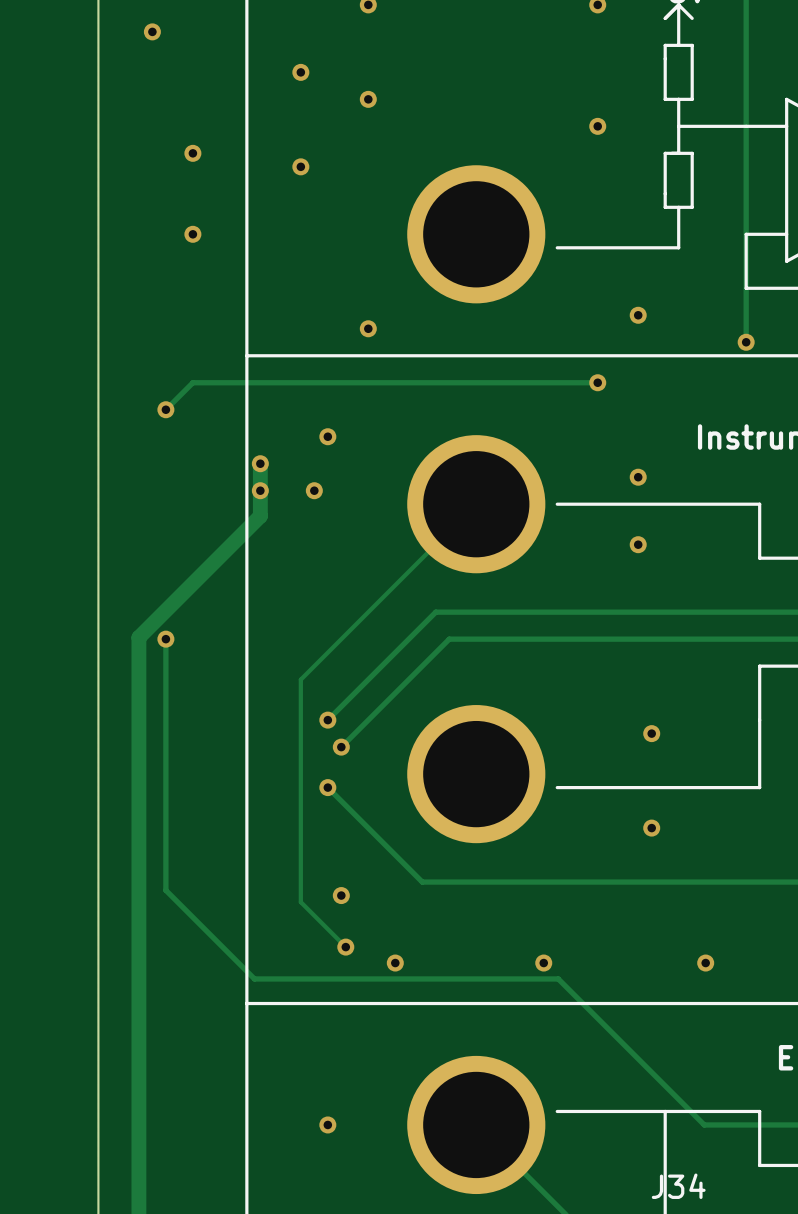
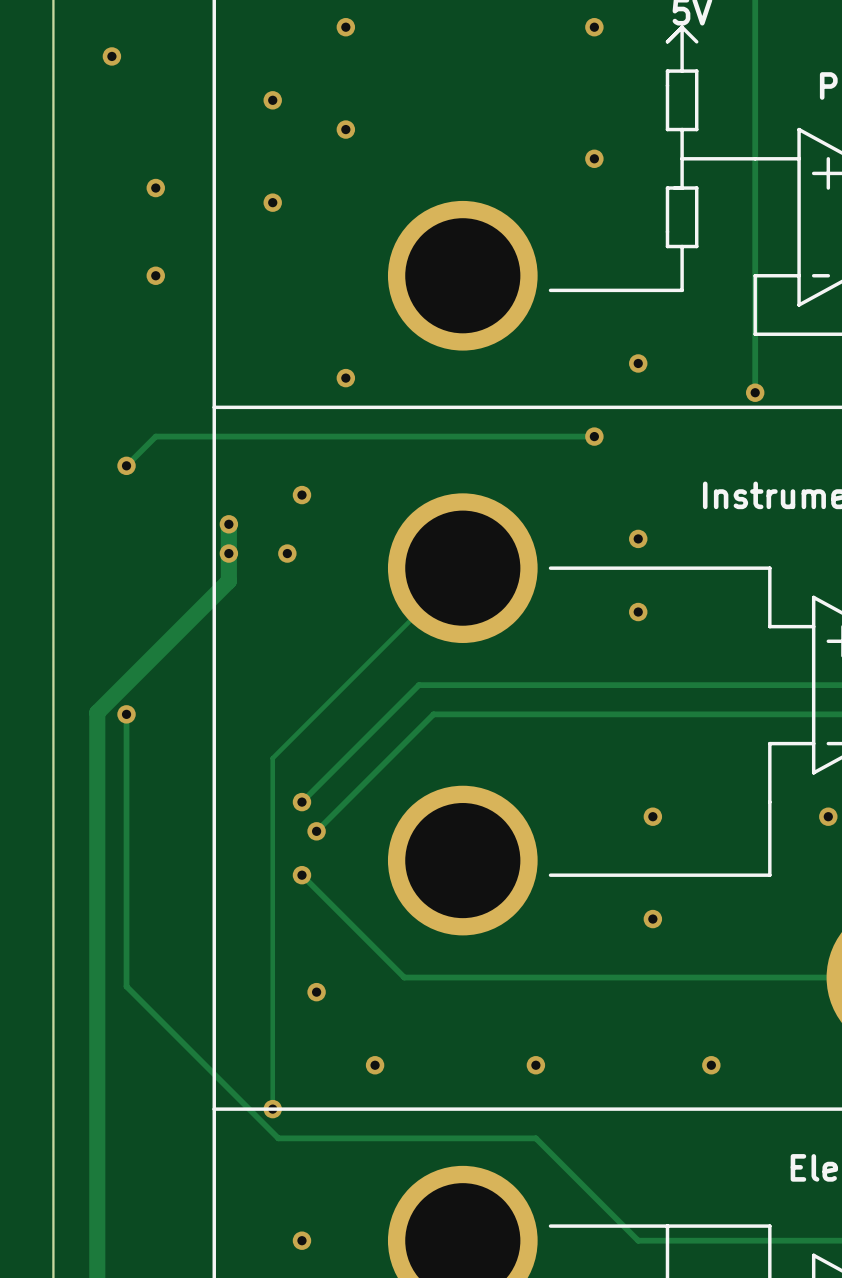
track: (300, 902) (345, 947) -> (272, 999) (272, 1109)
via position: (345, 947) -> (272, 1109)
track: (254, 978) (558, 978) (704, 1124) -> (222, 1082) (278, 1138) (535, 1138) (638, 1240) (709, 1240)

